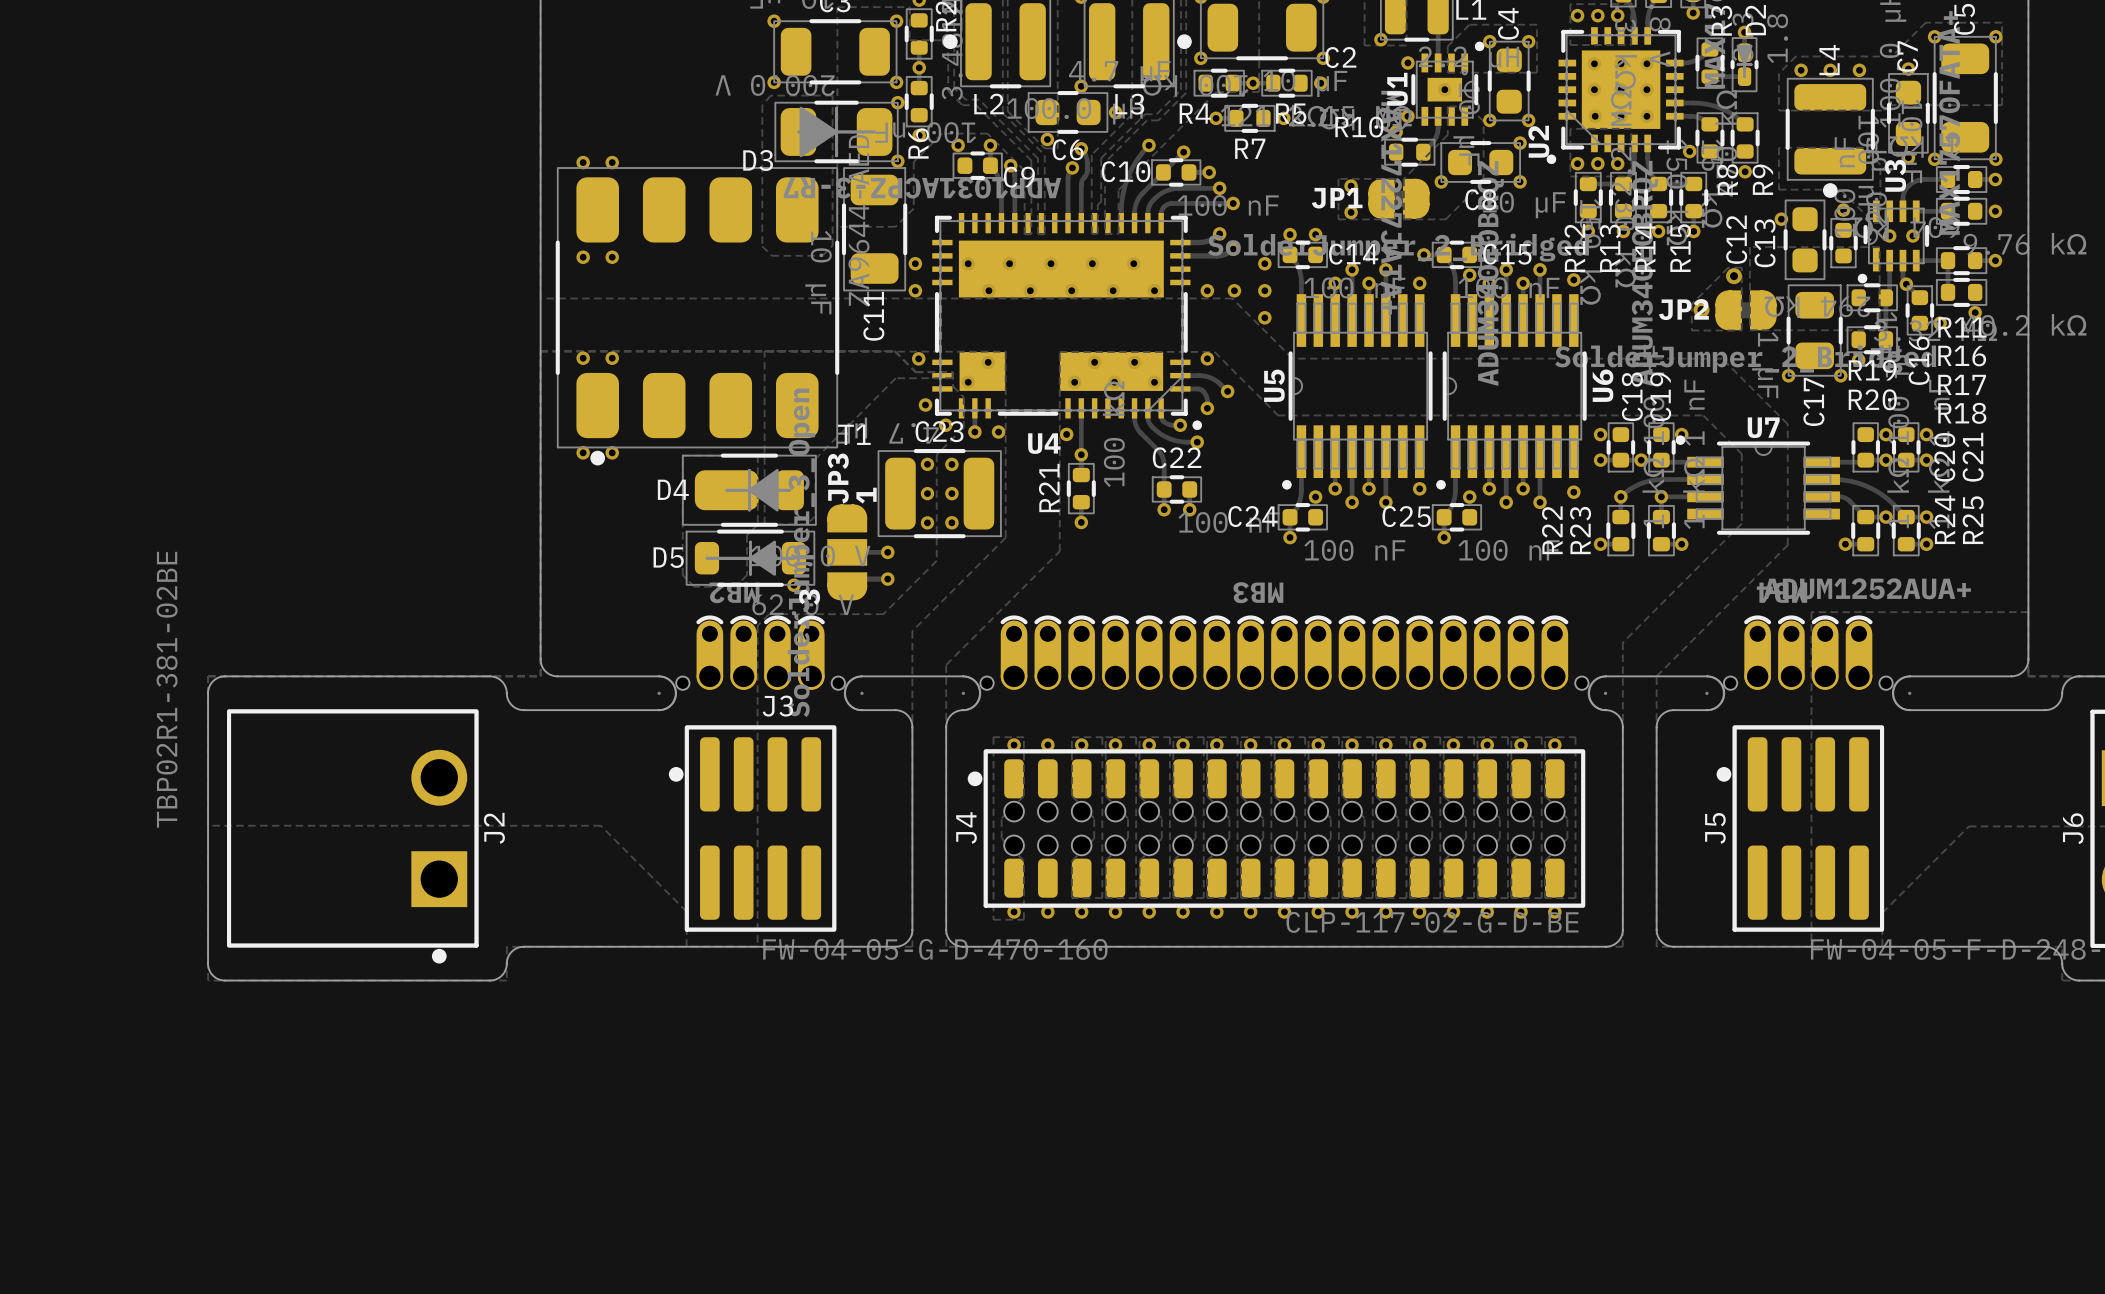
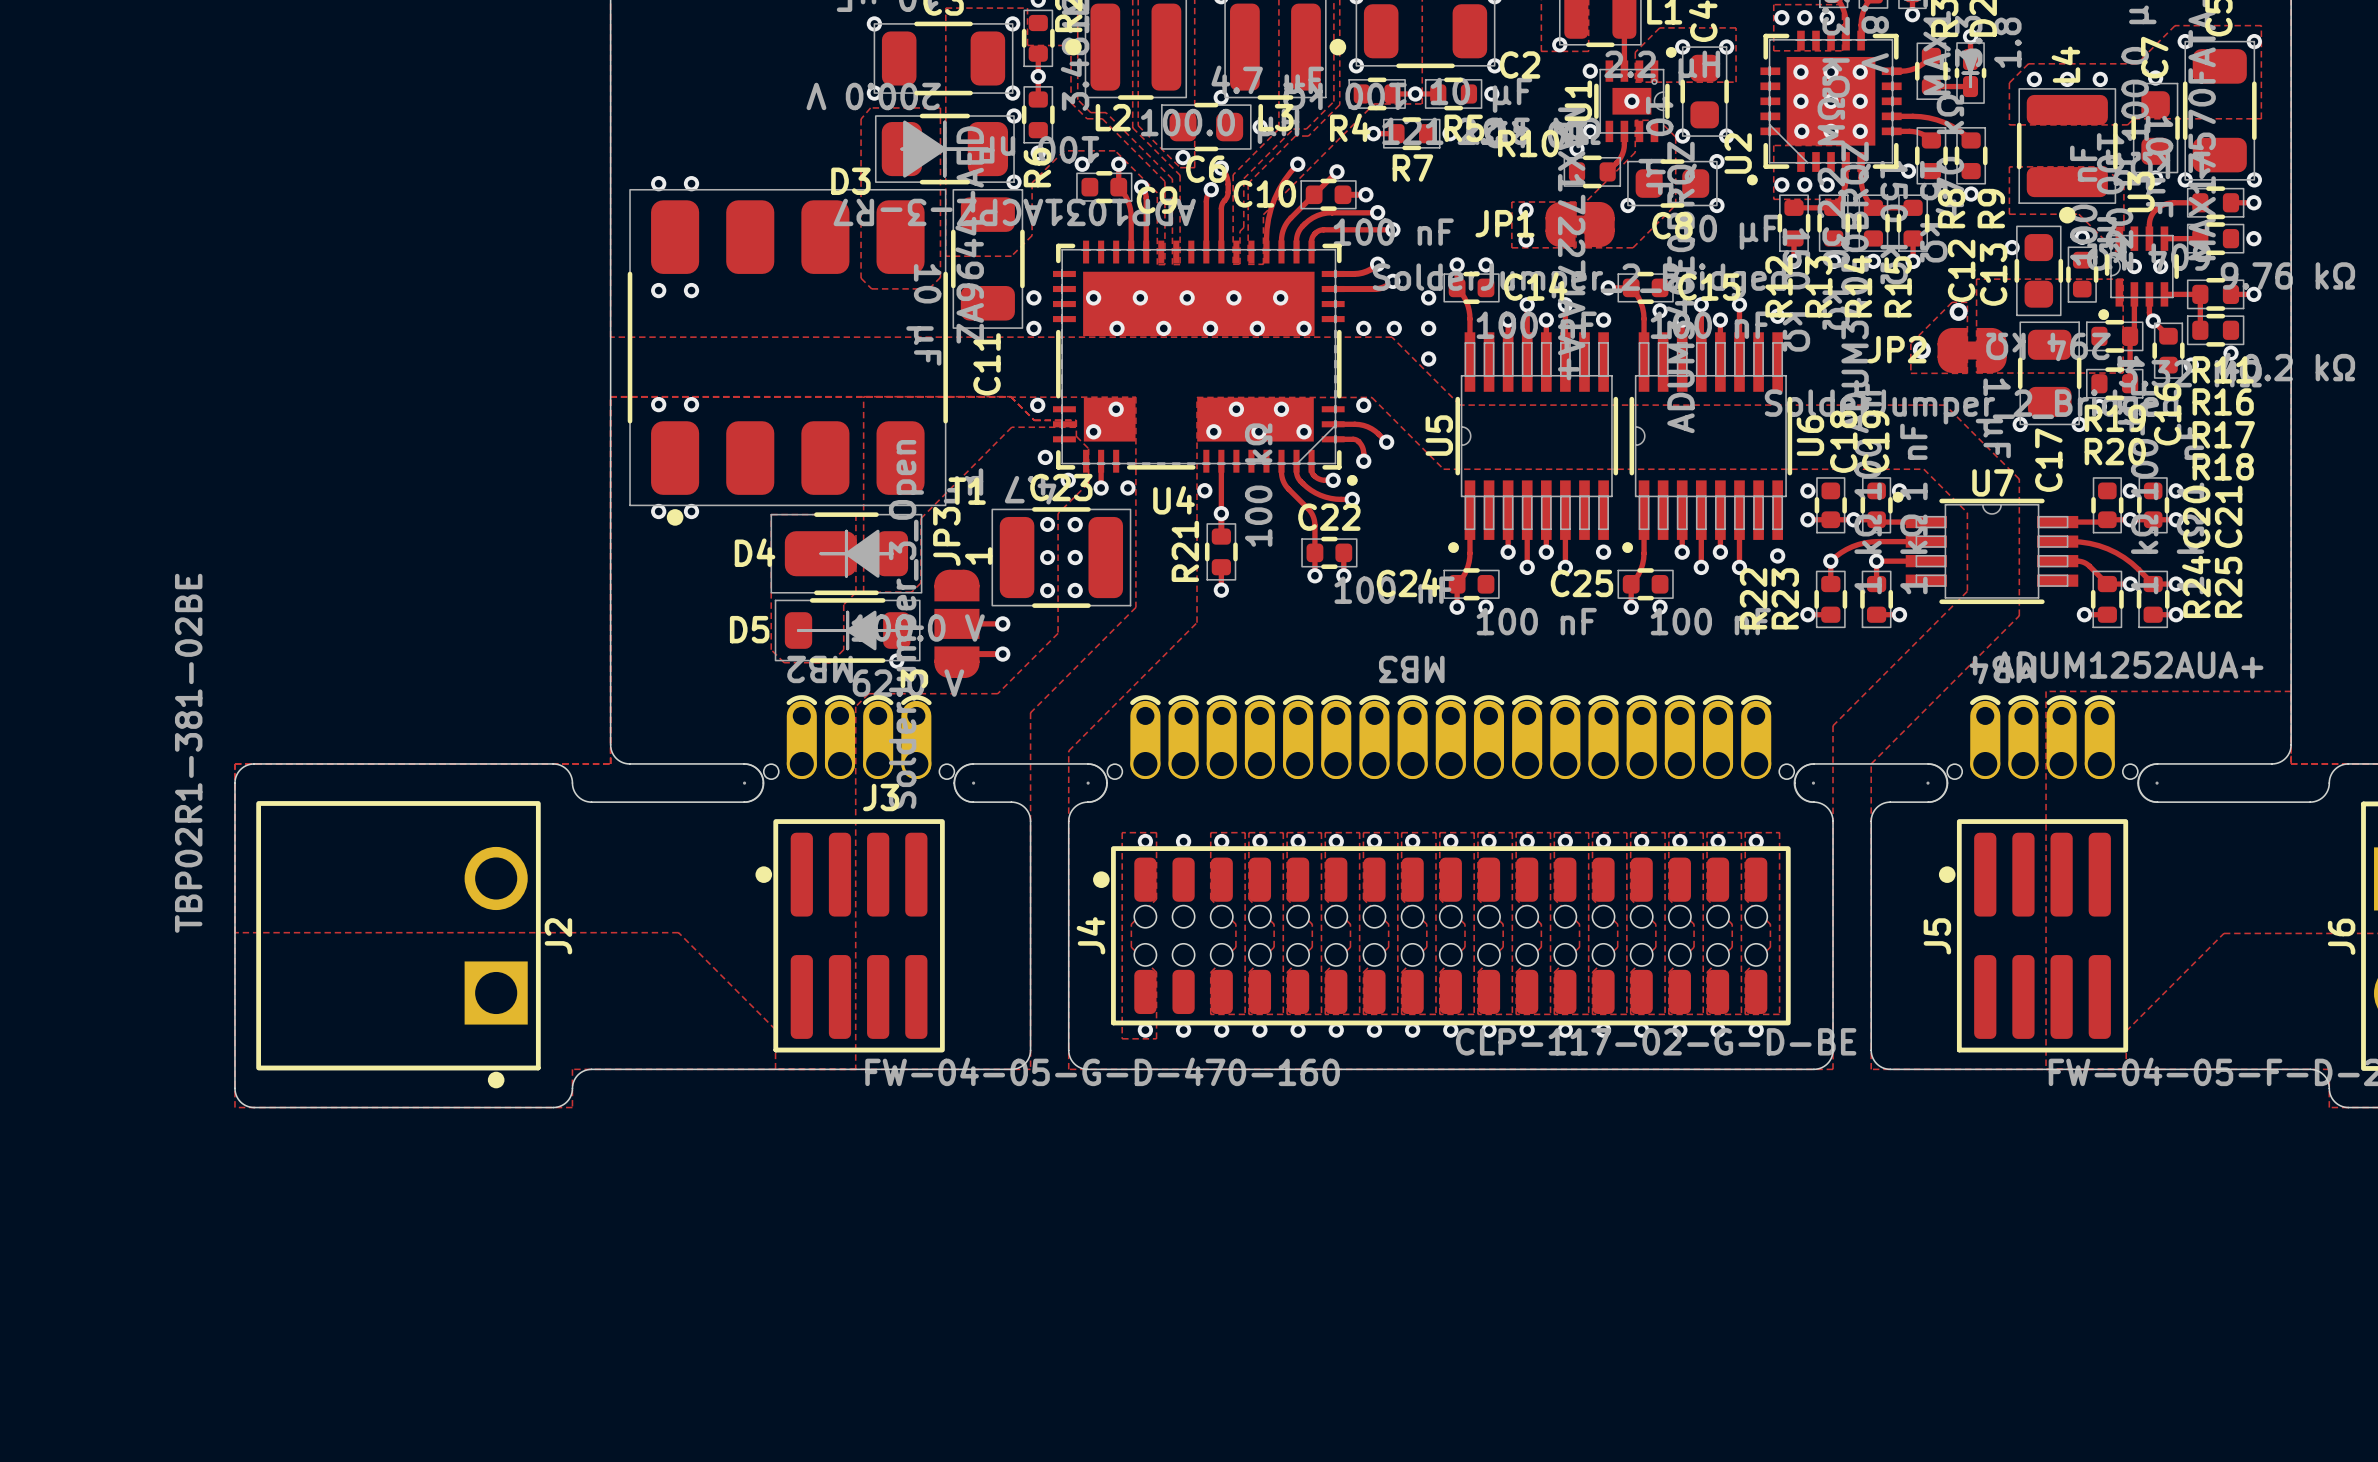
via position: (1315, 497) -> (1485, 607)
via position: (1469, 497) -> (1660, 607)

